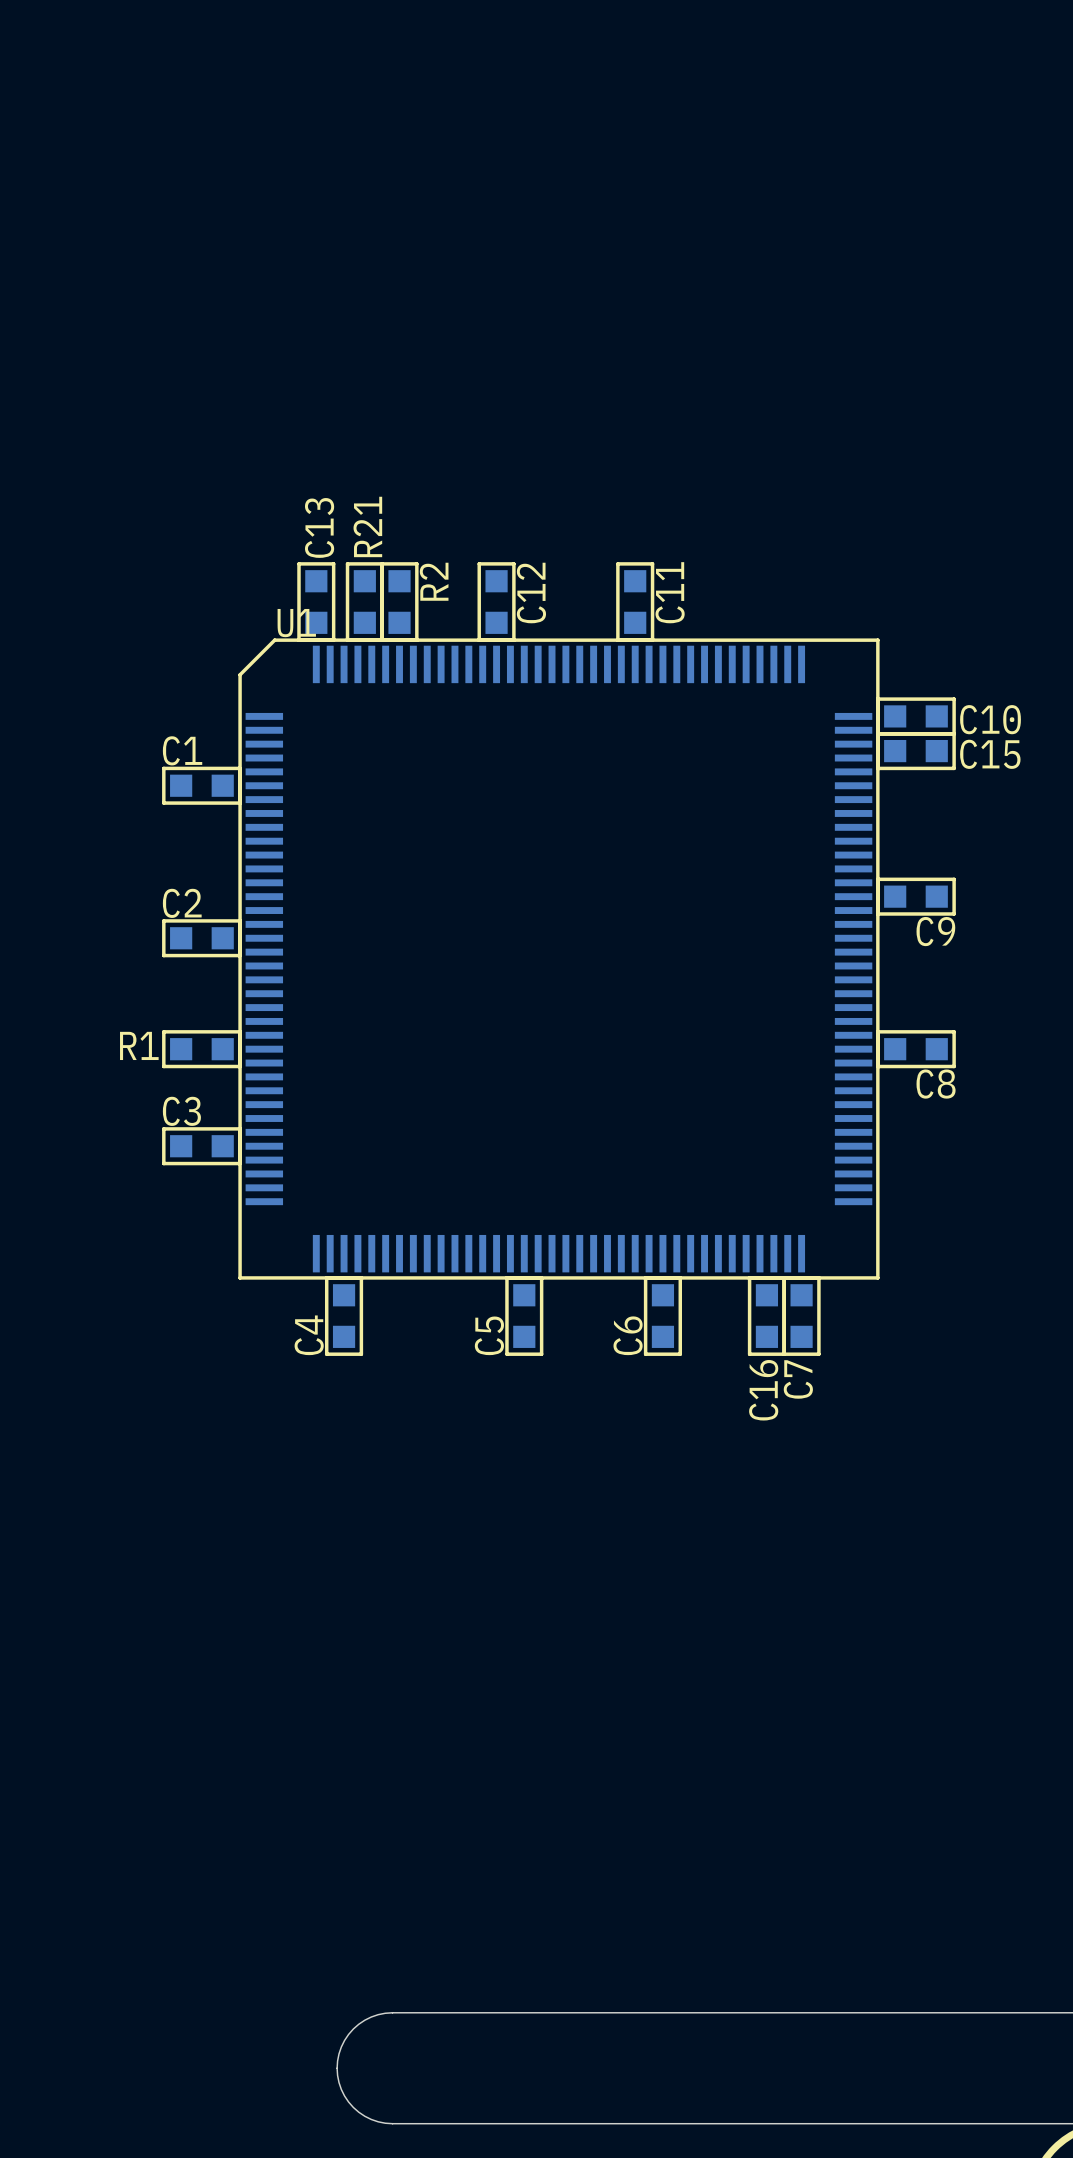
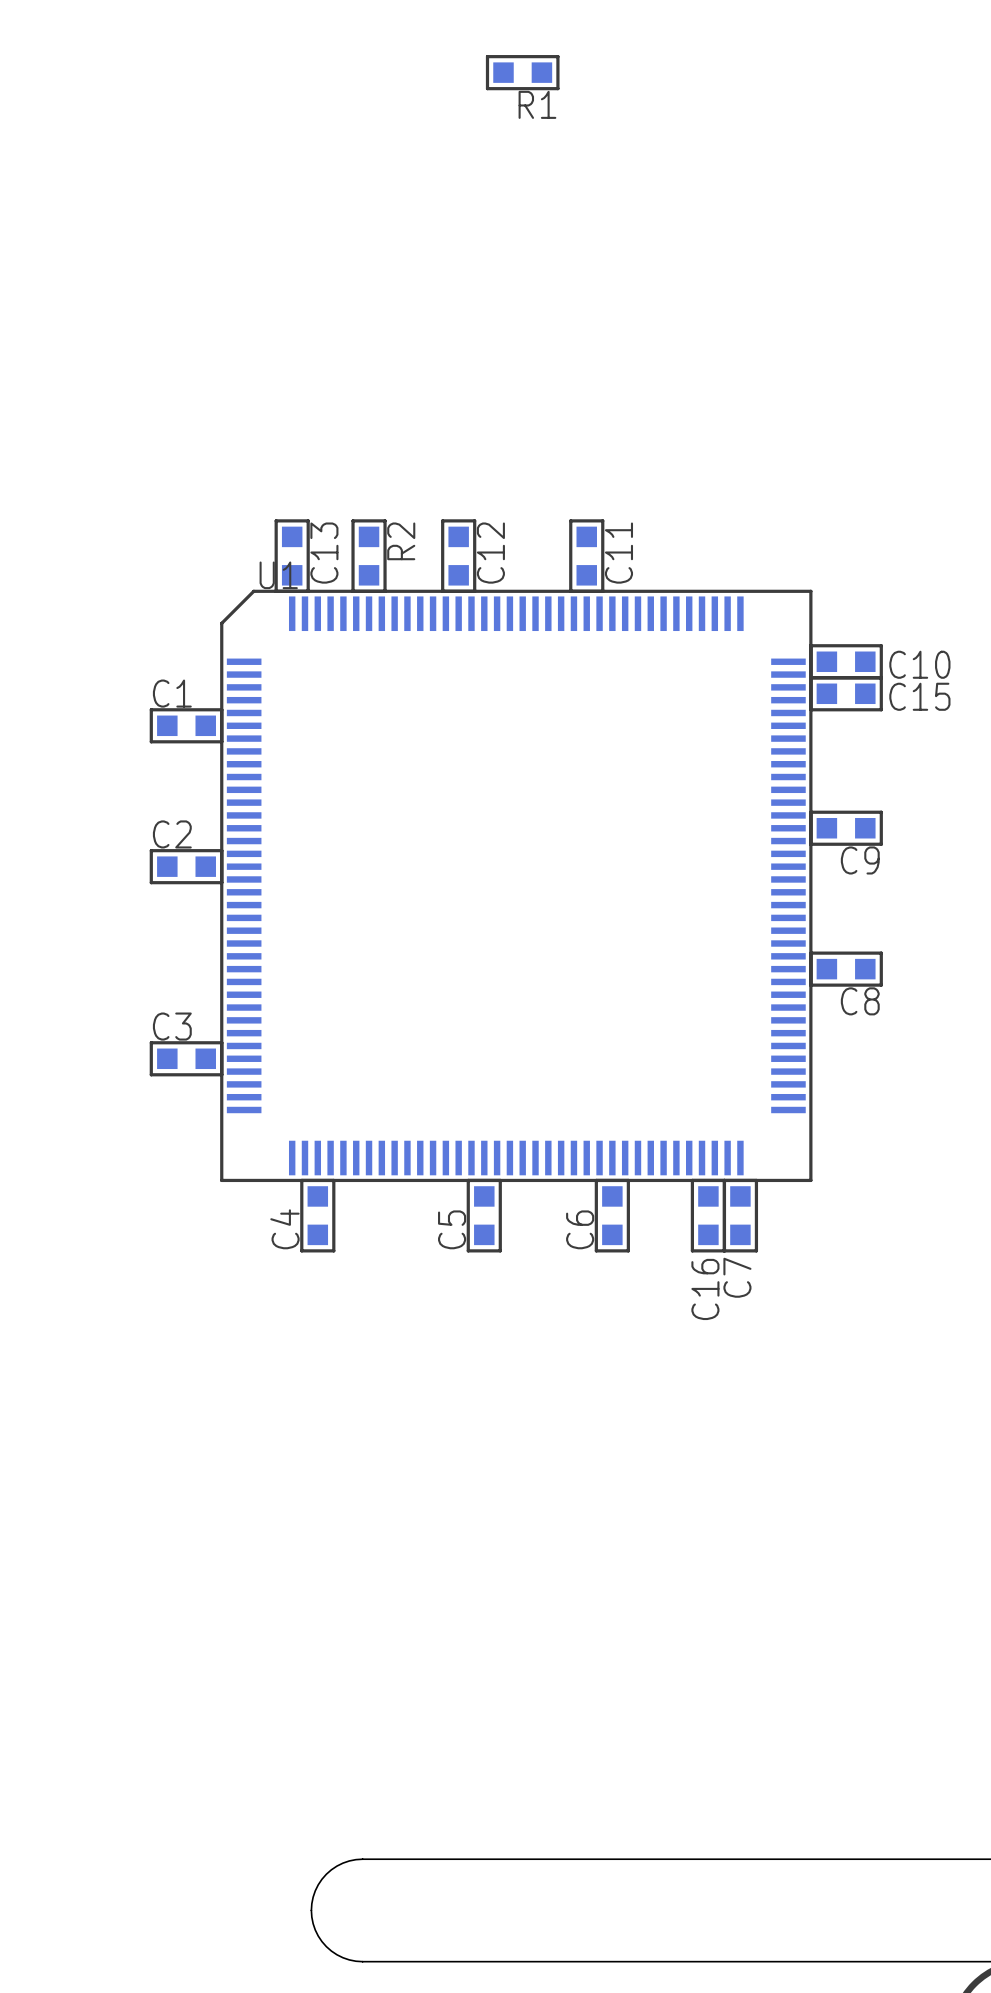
C13 name position: C13 (319, 527) -> C13 (324, 553)
R21: (364, 602) -> none
R1 name position: R1 (139, 1045) -> R1 (537, 104)
R1 position: (201, 1049) -> (522, 72)

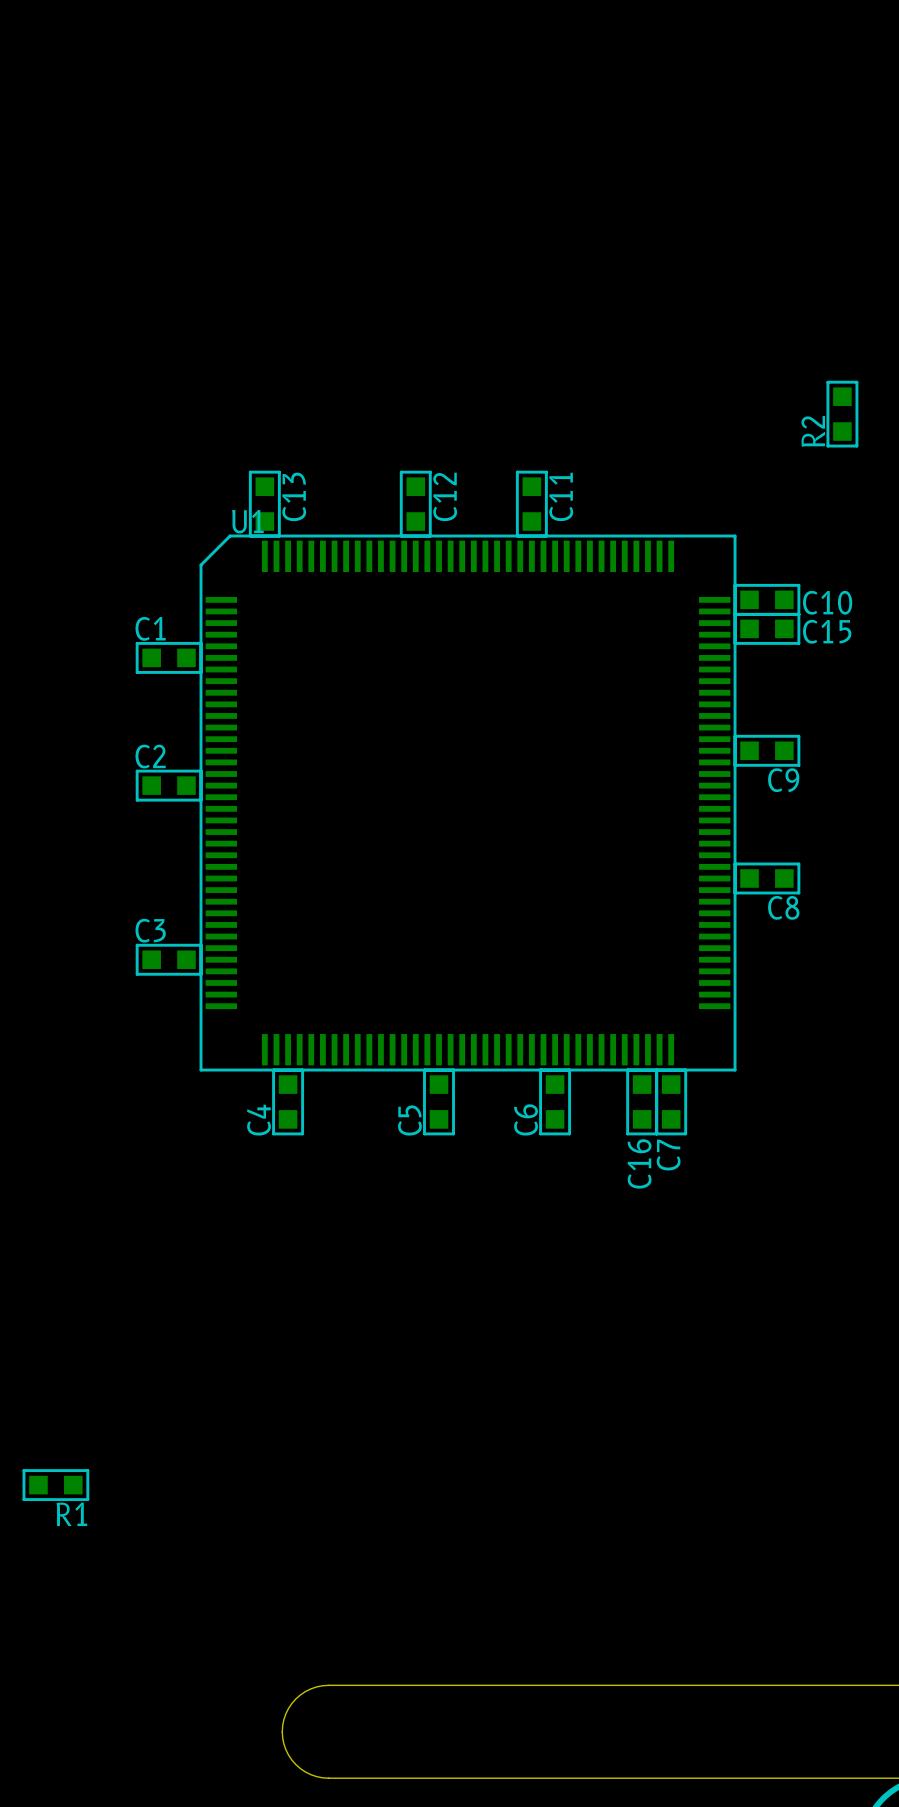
R1 position: (522, 72) -> (55, 1485)
R2 name position: R2 (401, 541) -> R2 (813, 431)
R2 position: (369, 556) -> (842, 414)

